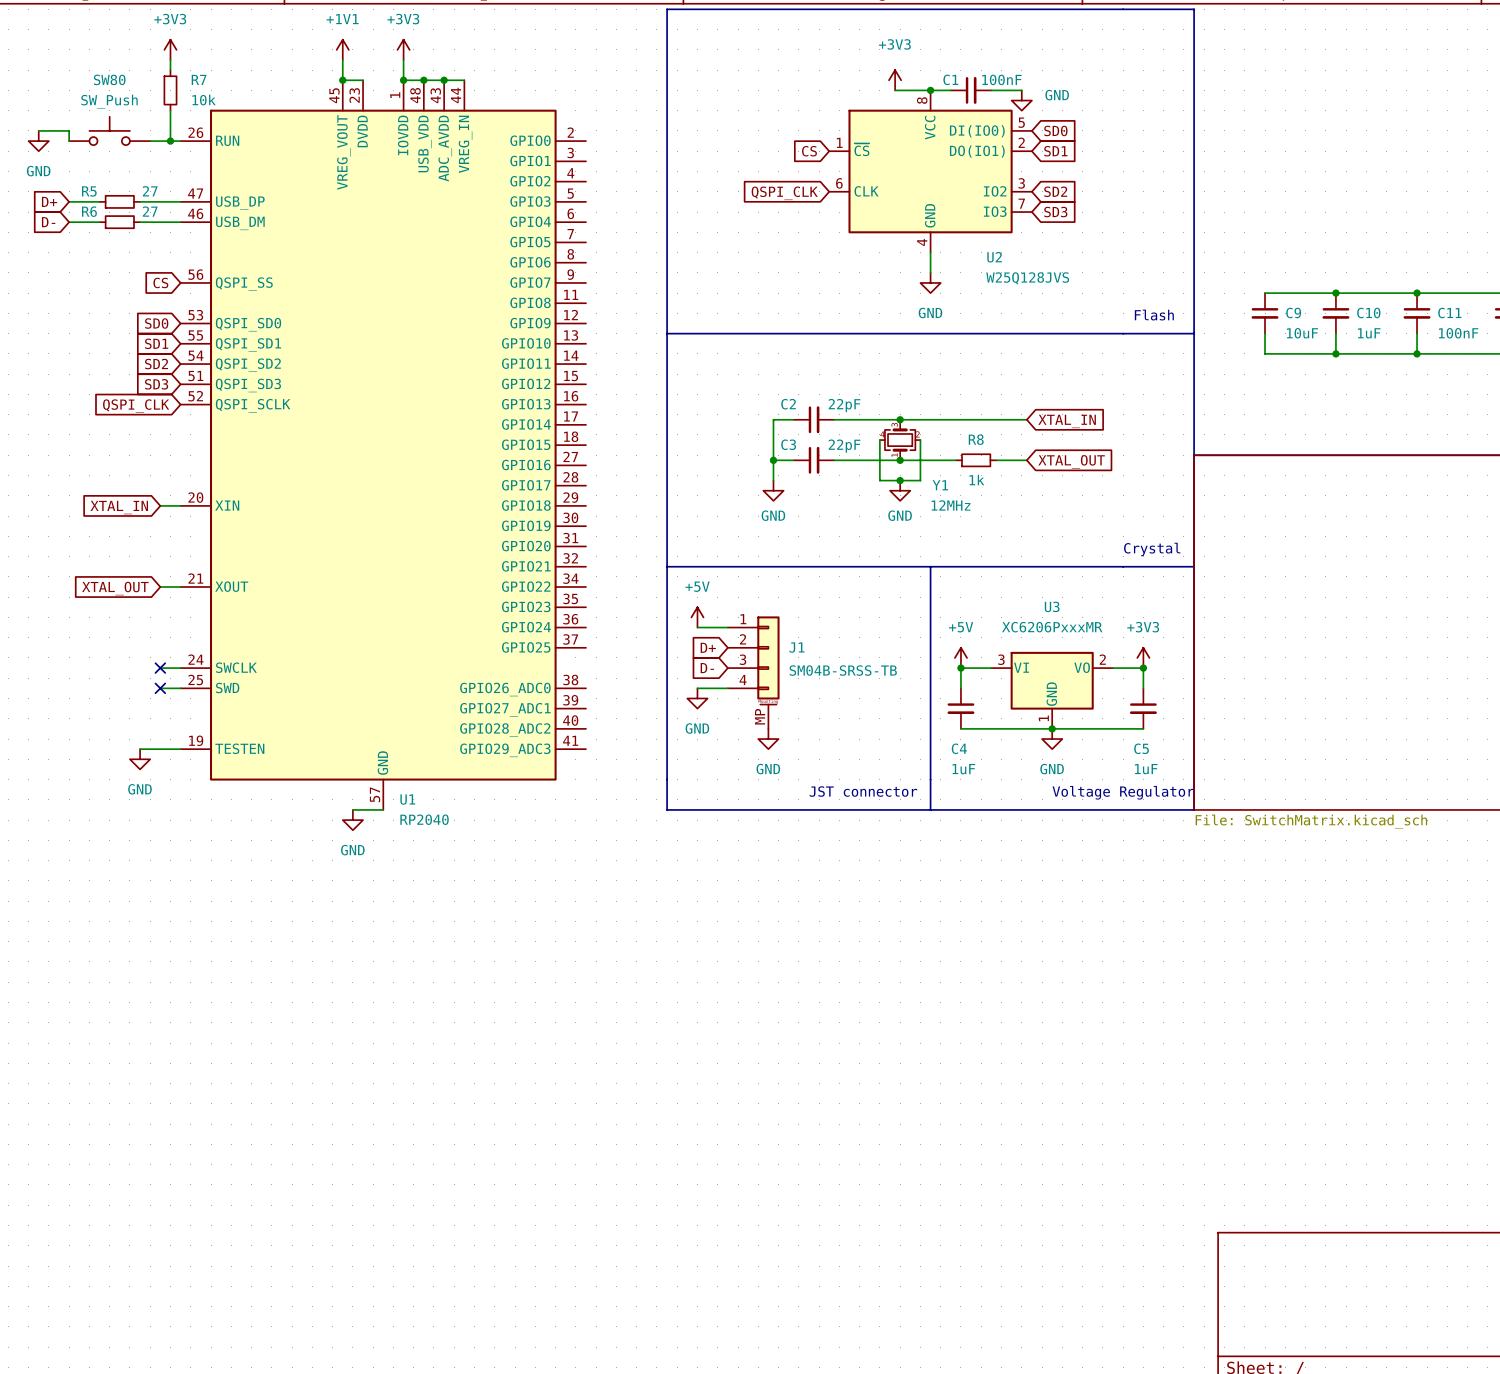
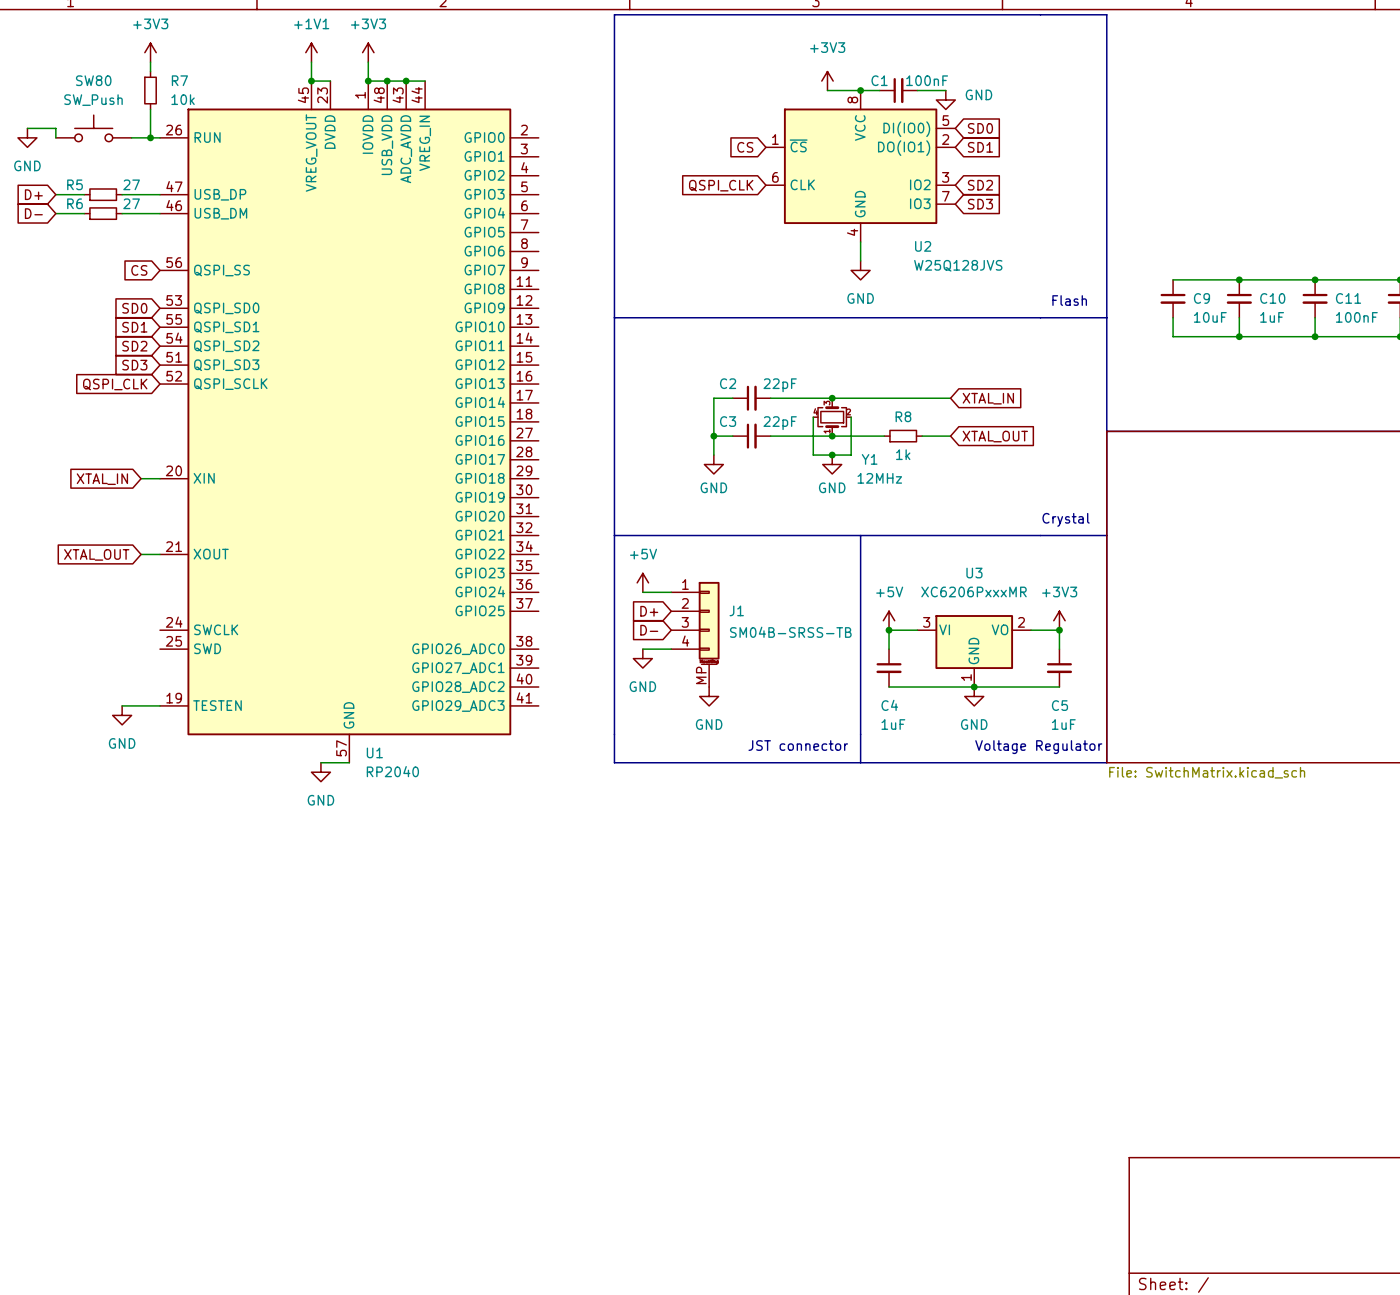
wire: (160, 668) (180, 668) -> none
no-connect mark: (160, 668) -> none
wire: (160, 688) (180, 688) -> none
no-connect mark: (160, 688) -> none

